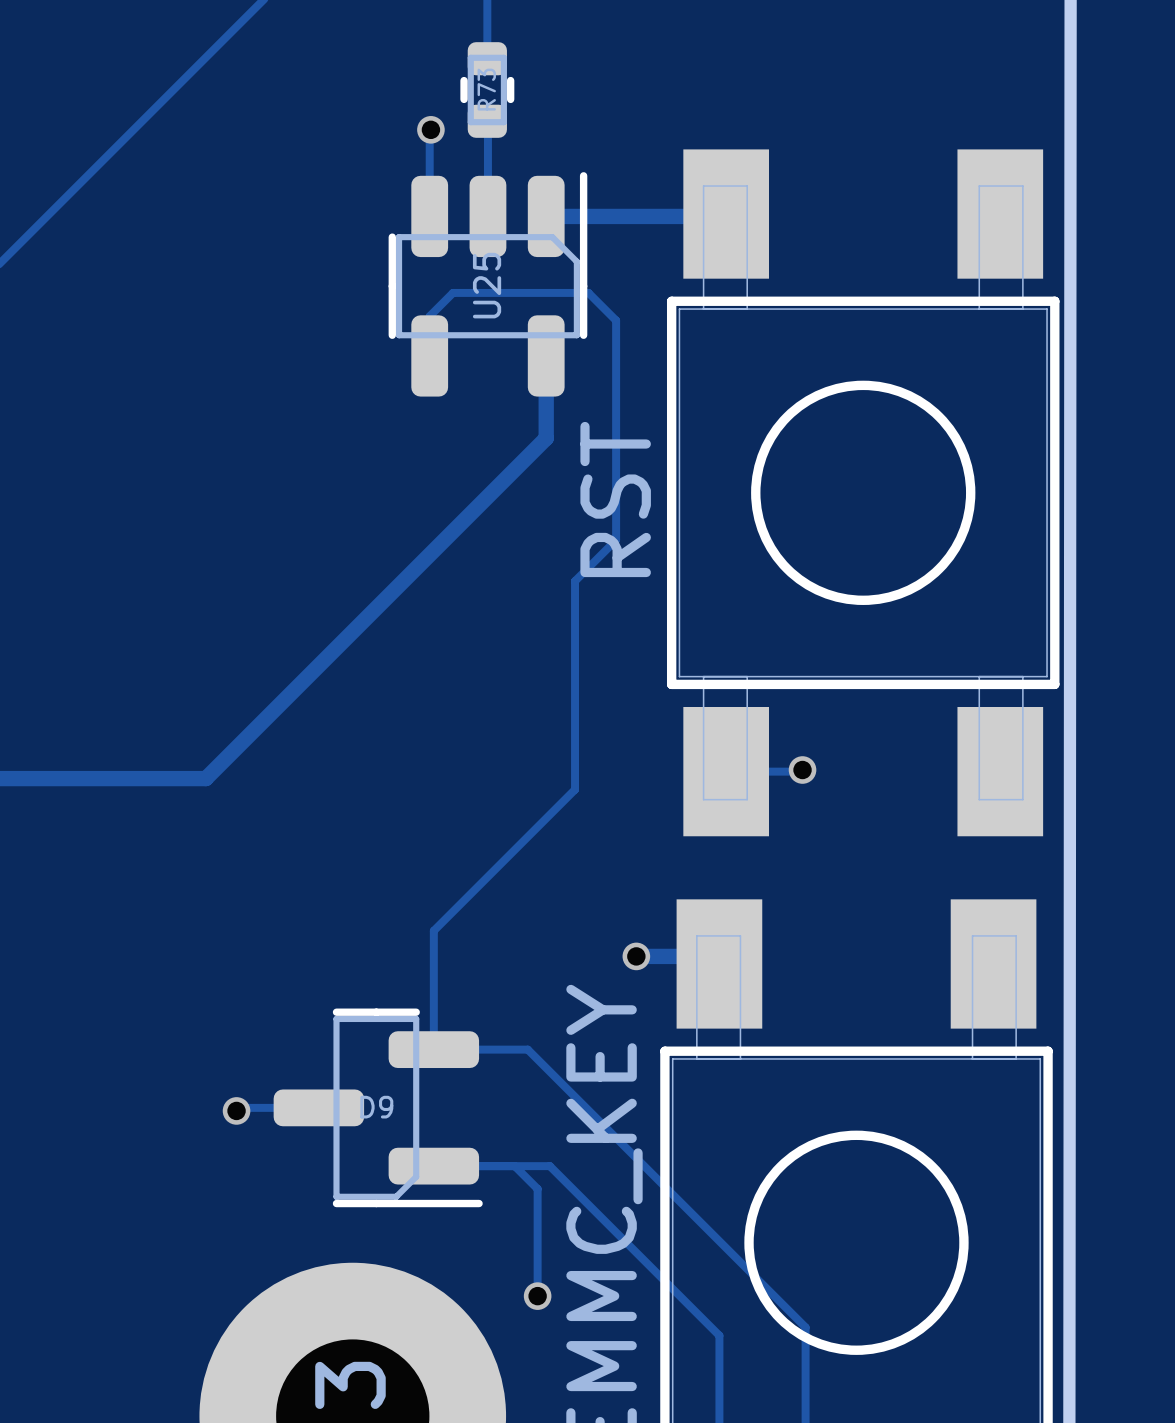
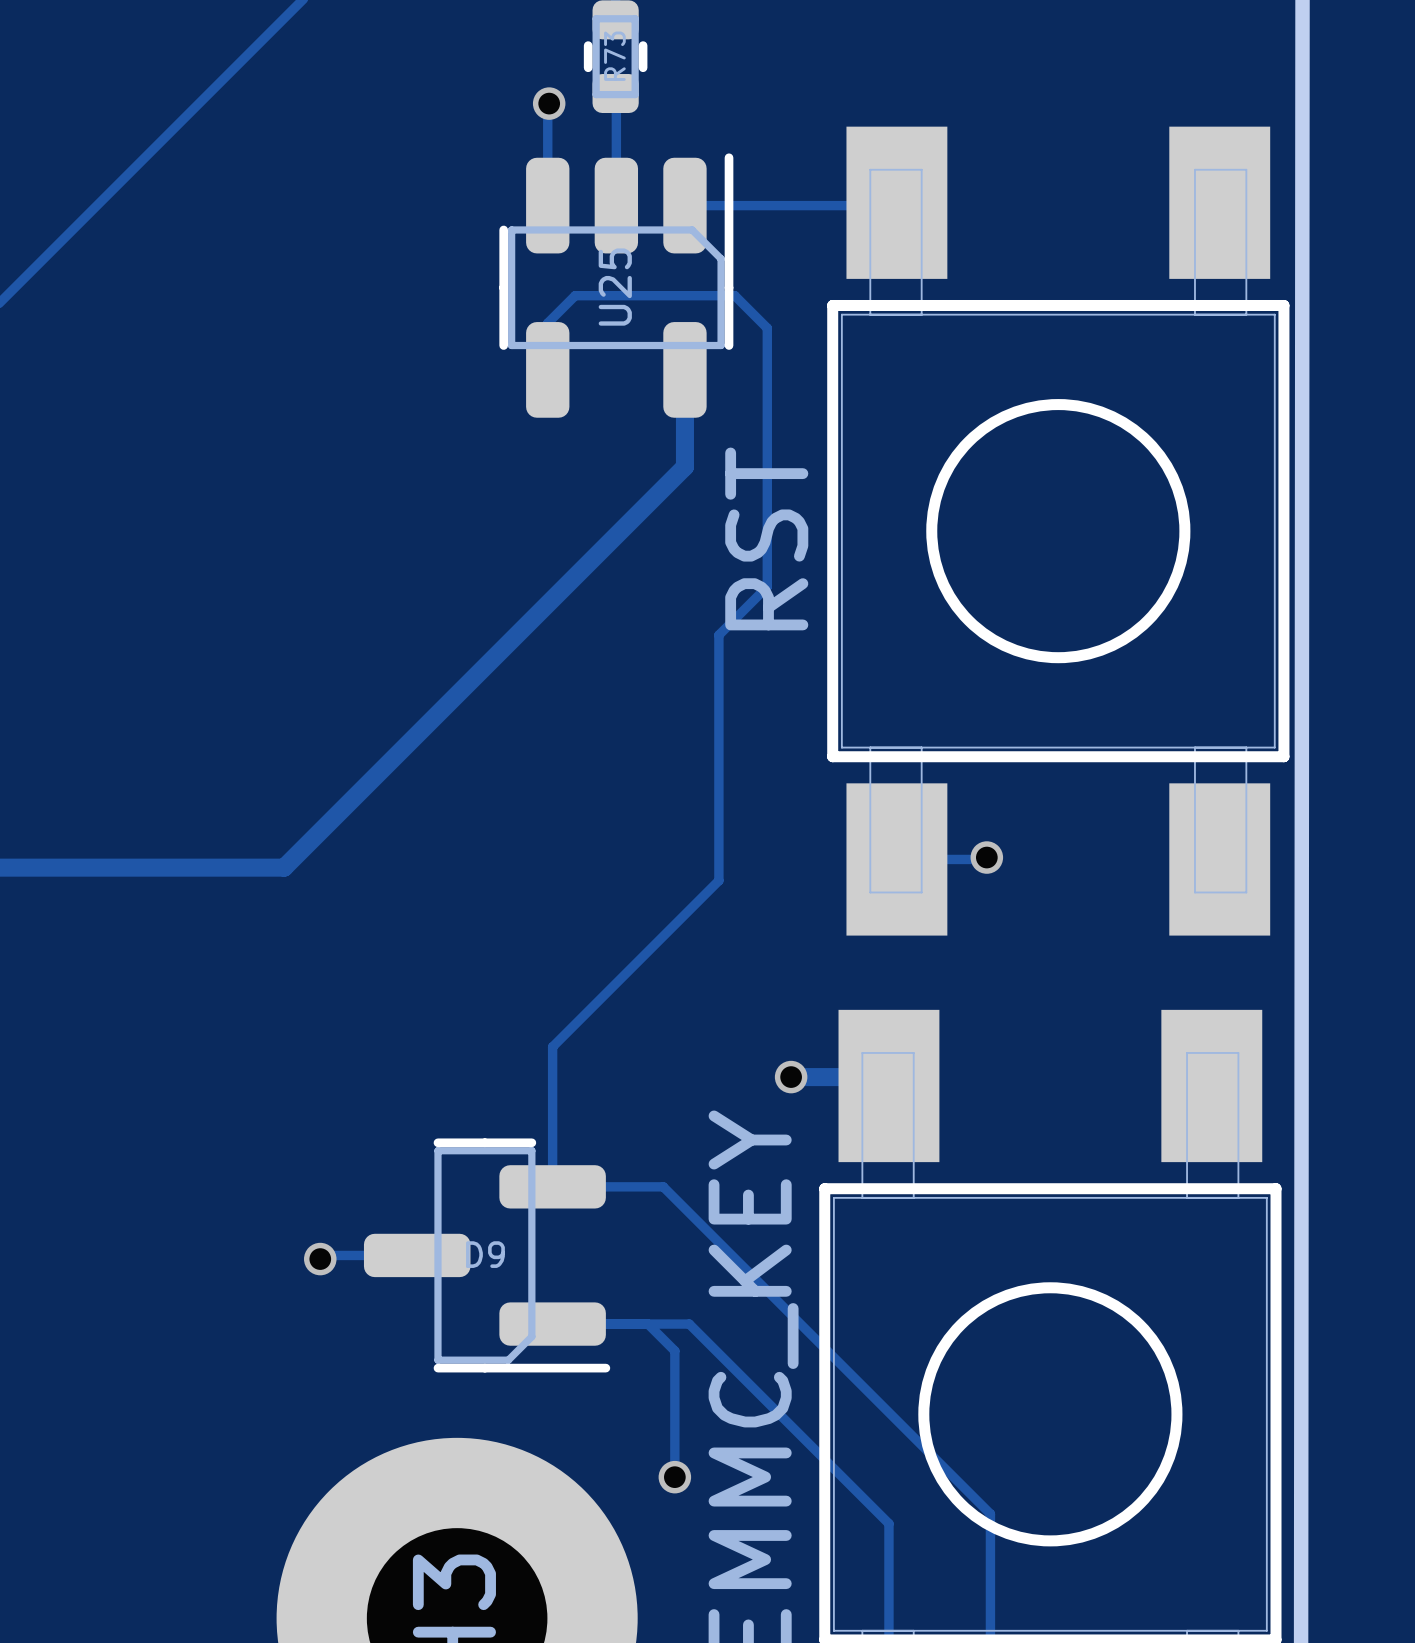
track width: thick (546, 216) (723, 216) -> thin (684, 205) (894, 205)

